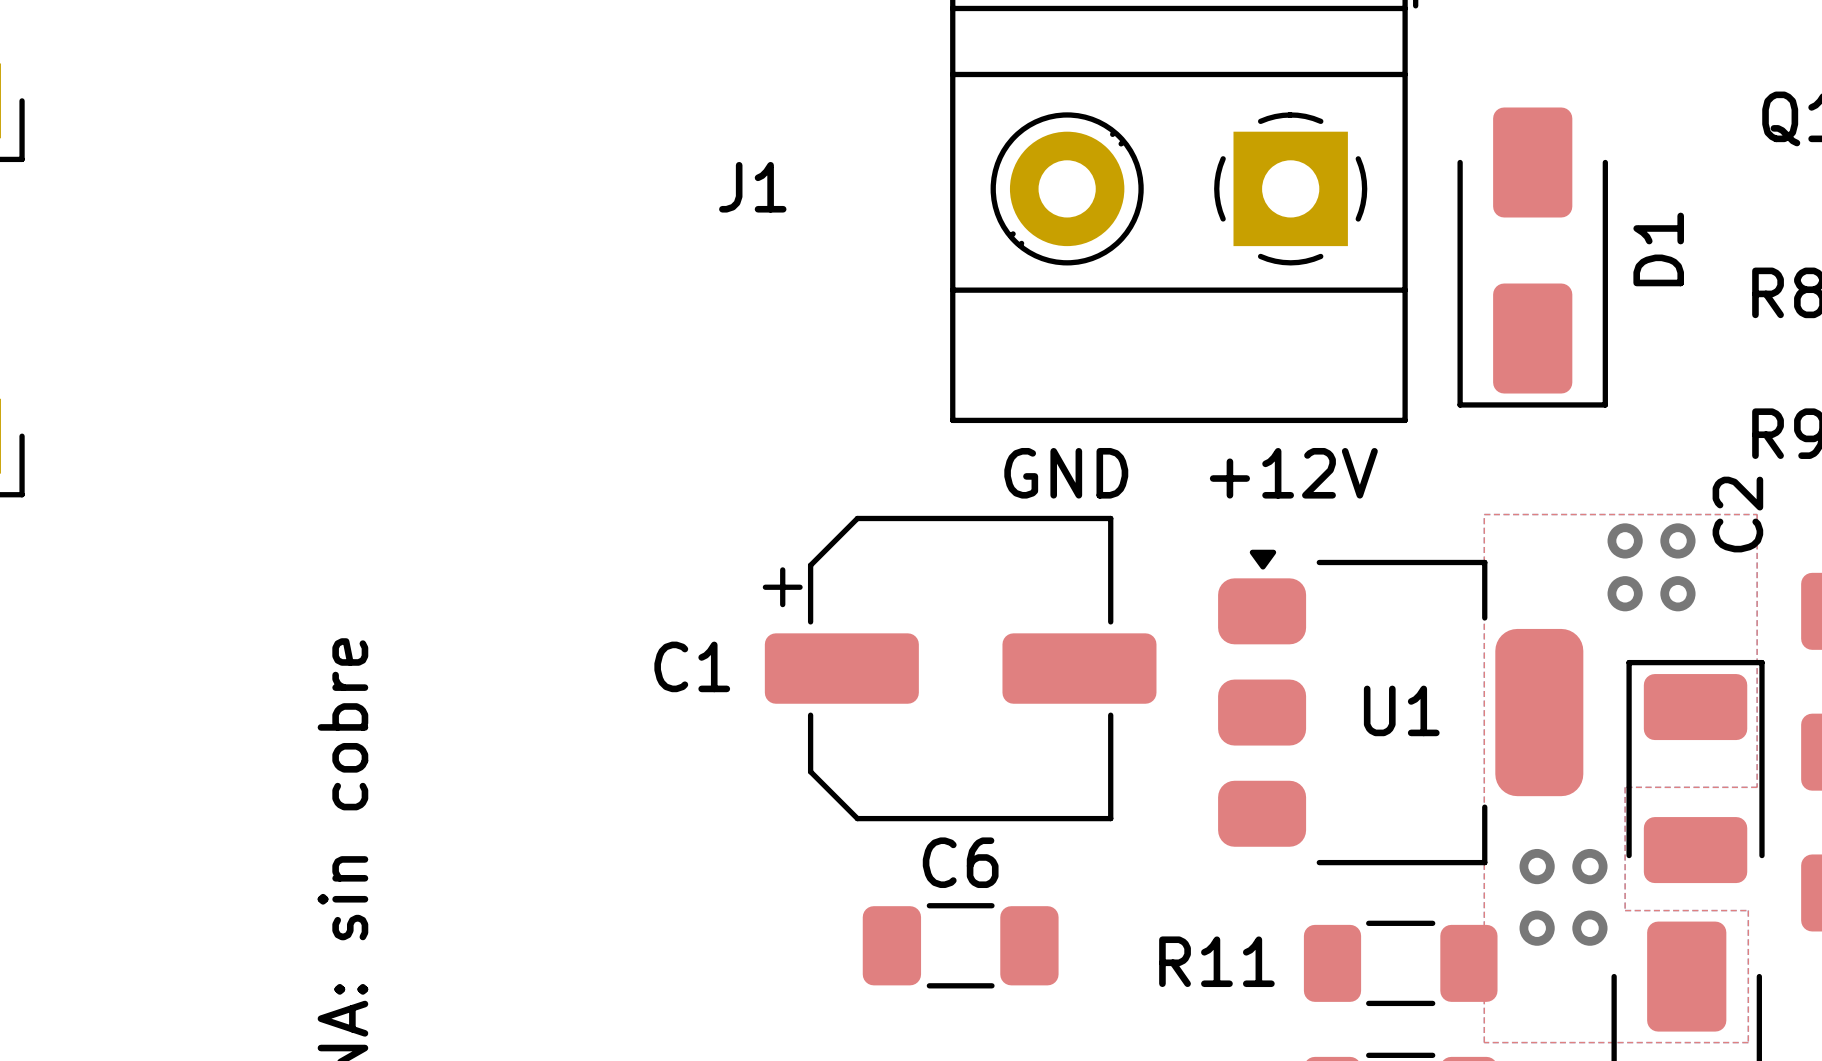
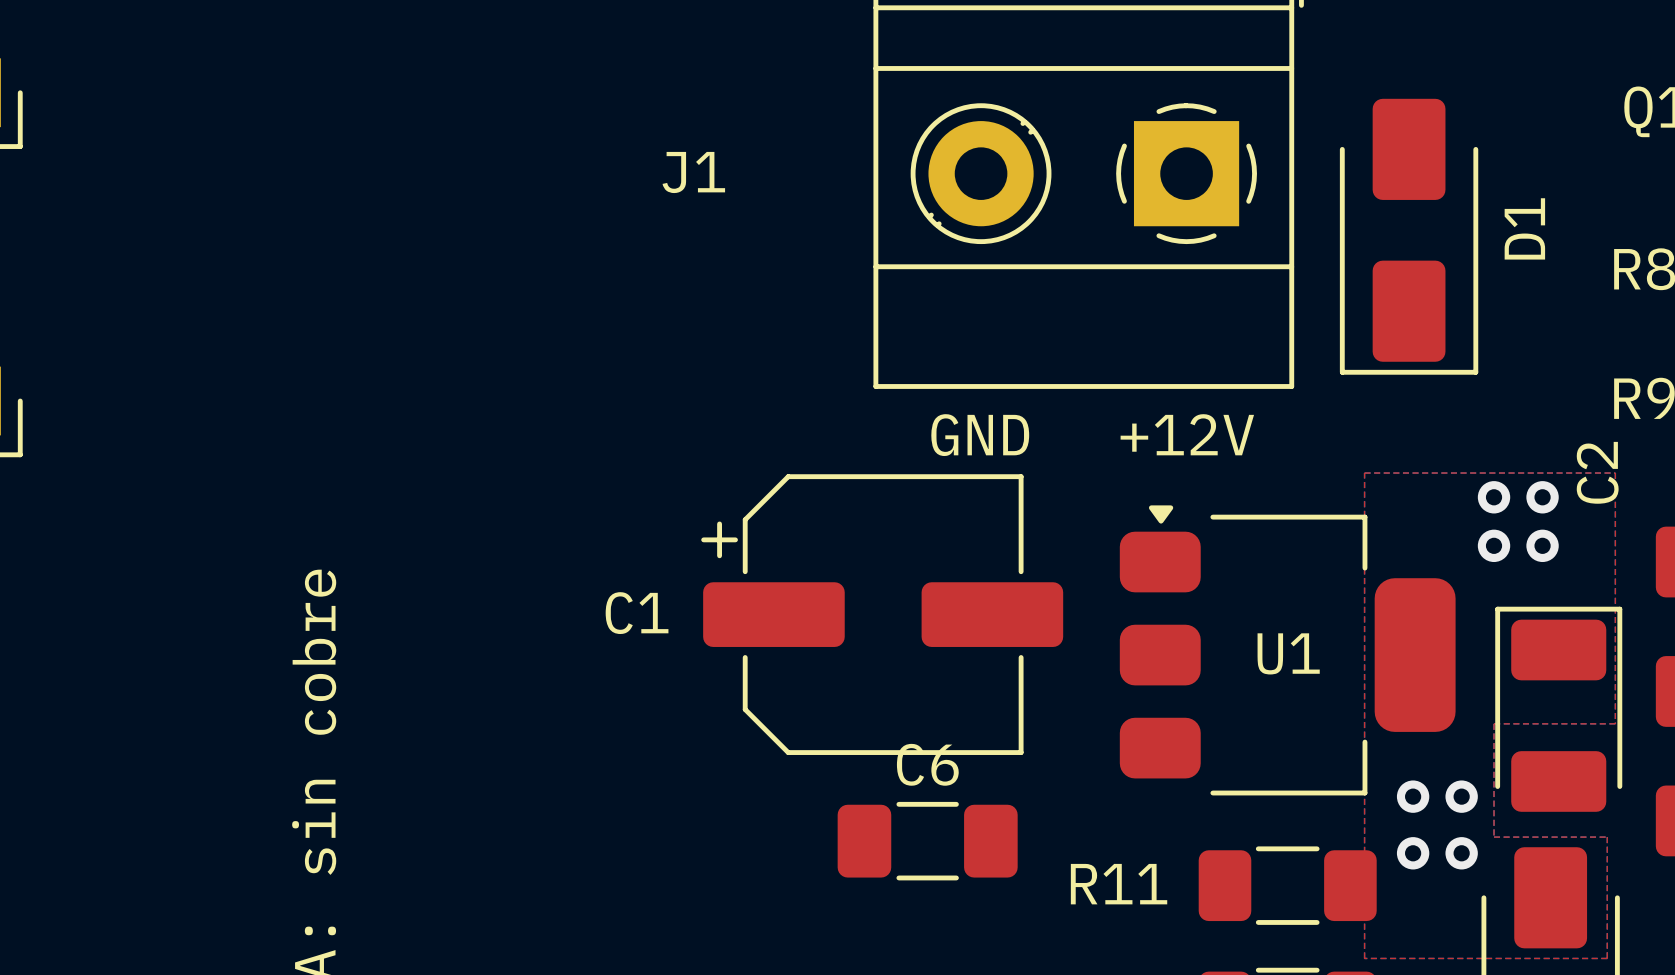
C6 position: (960, 945) -> (927, 841)

